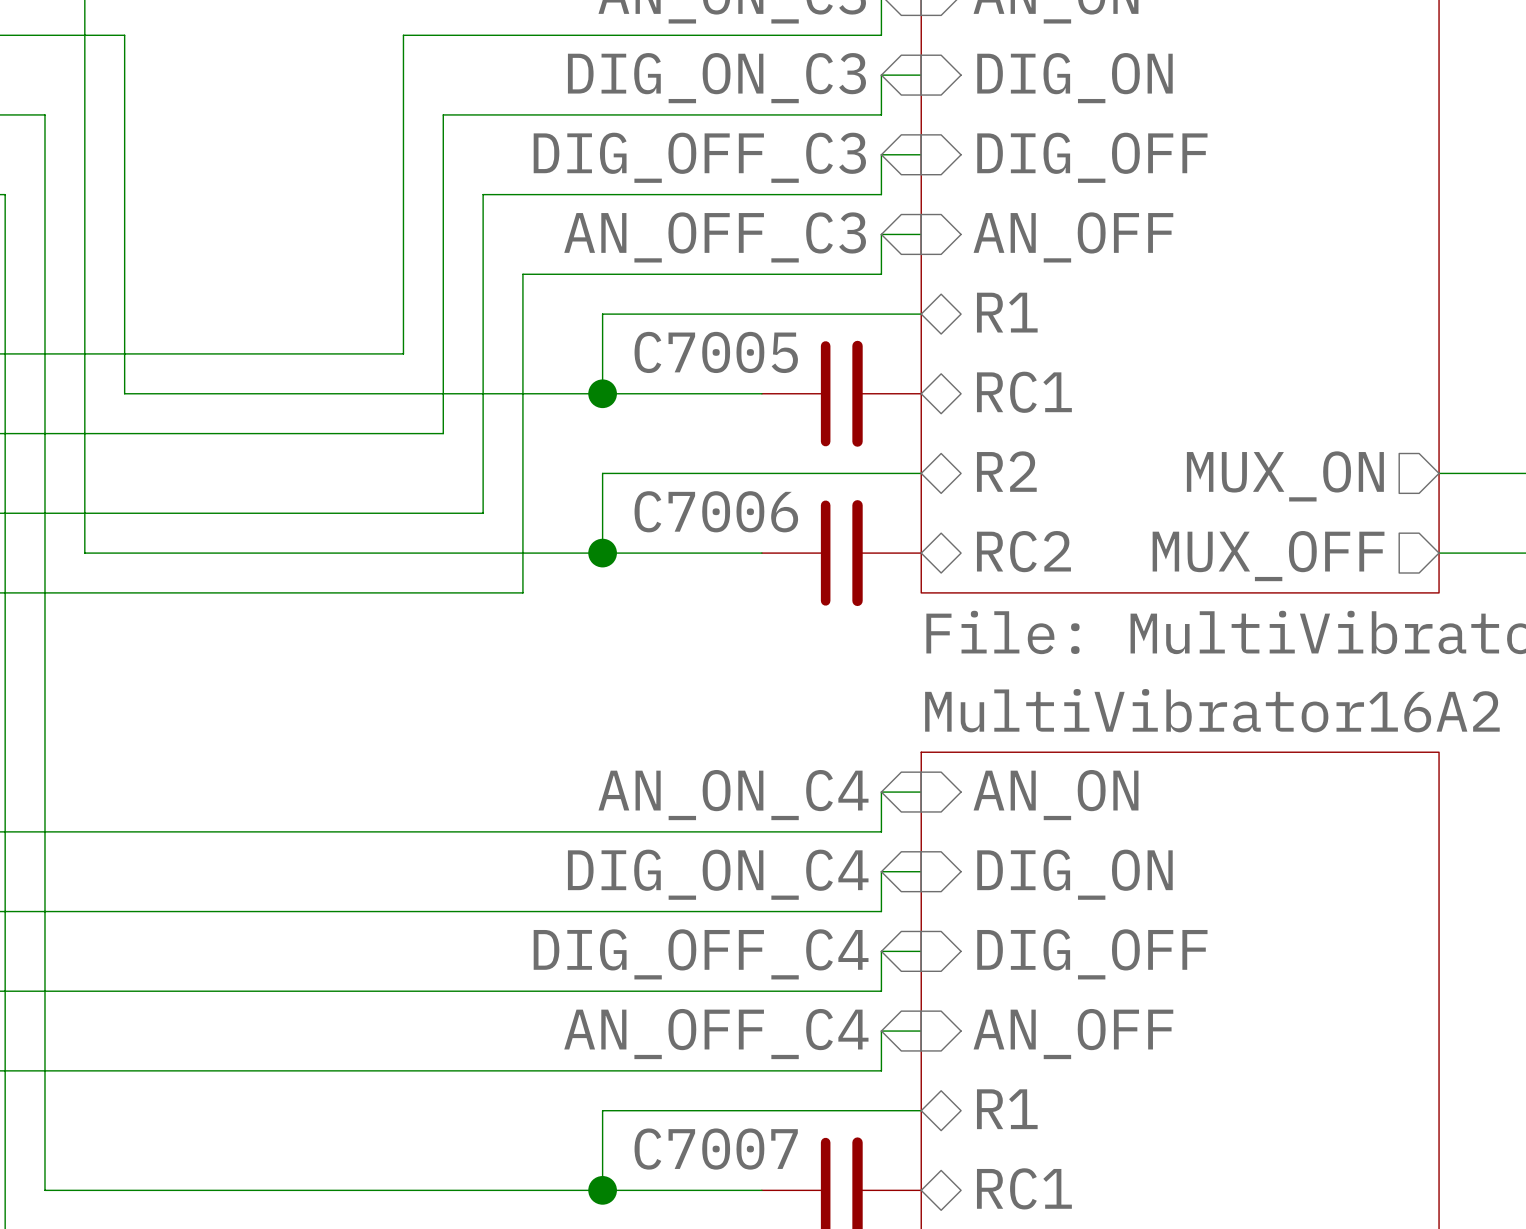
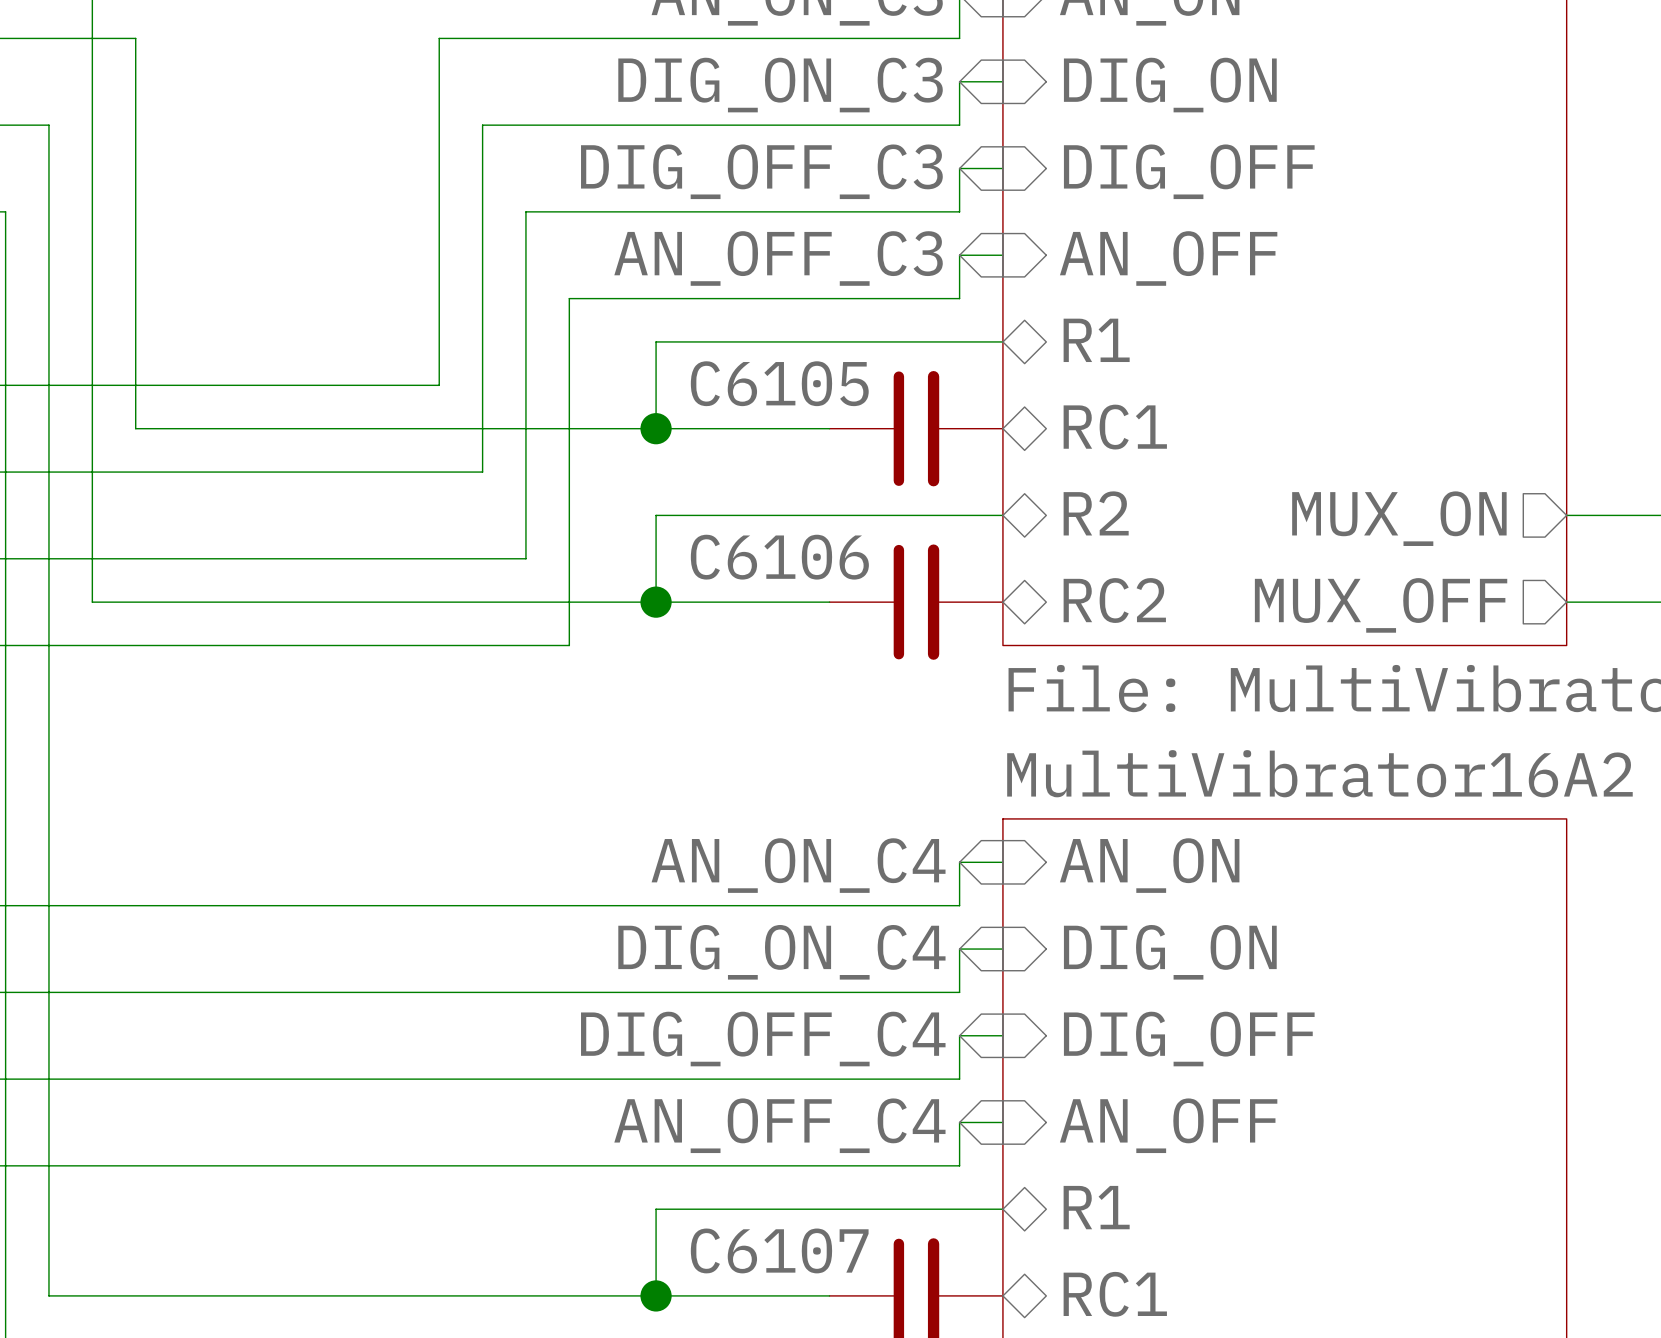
C7005 name: C7005 (716, 352) -> C6105 (779, 383)
C7006 name: C7006 (716, 511) -> C6106 (779, 557)
C7007 name: C7007 (716, 1149) -> C6107 (779, 1250)

